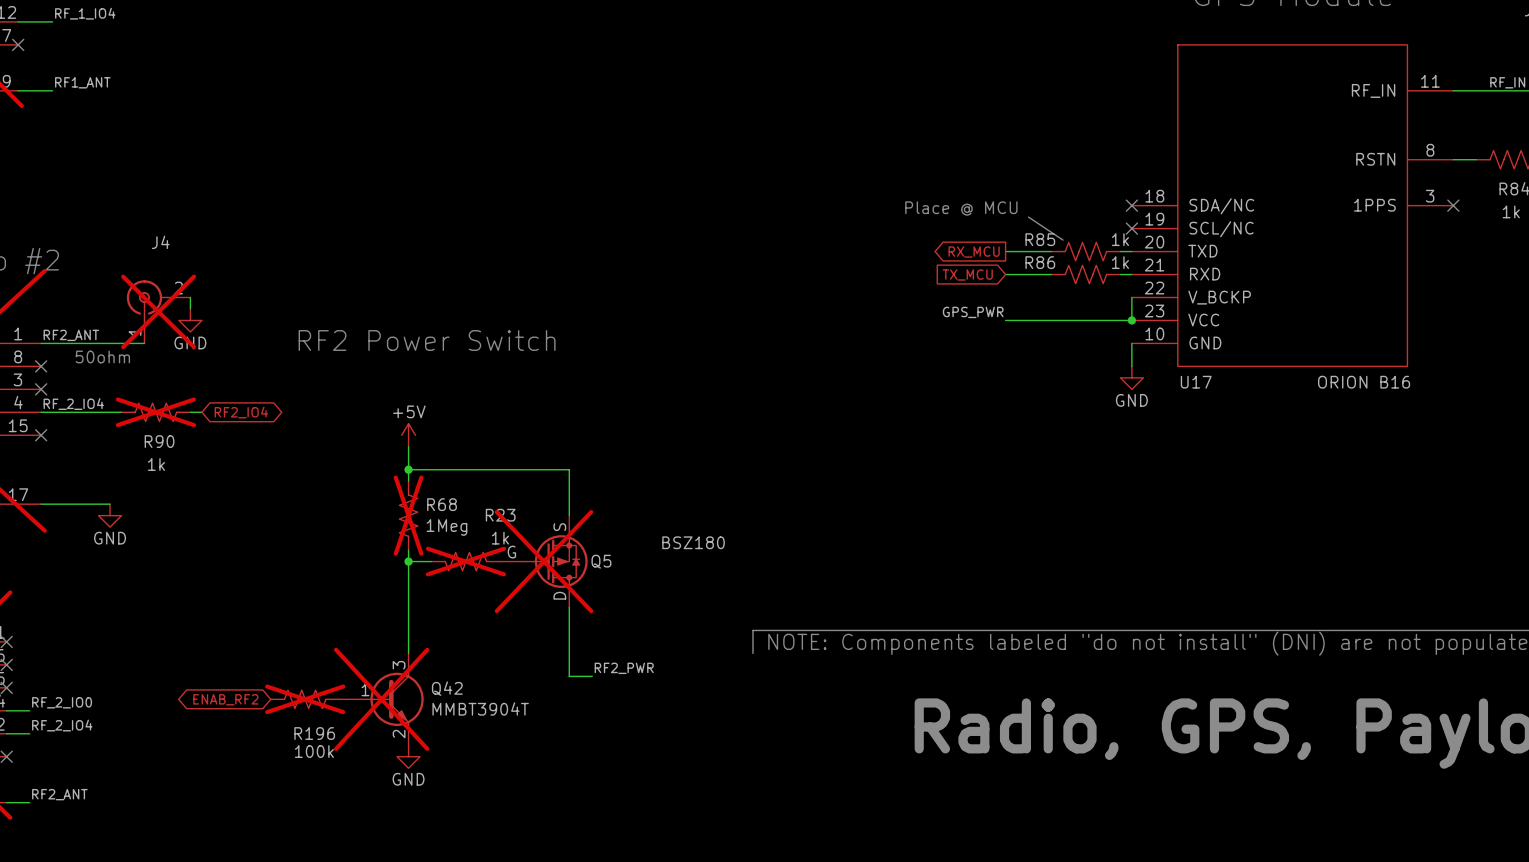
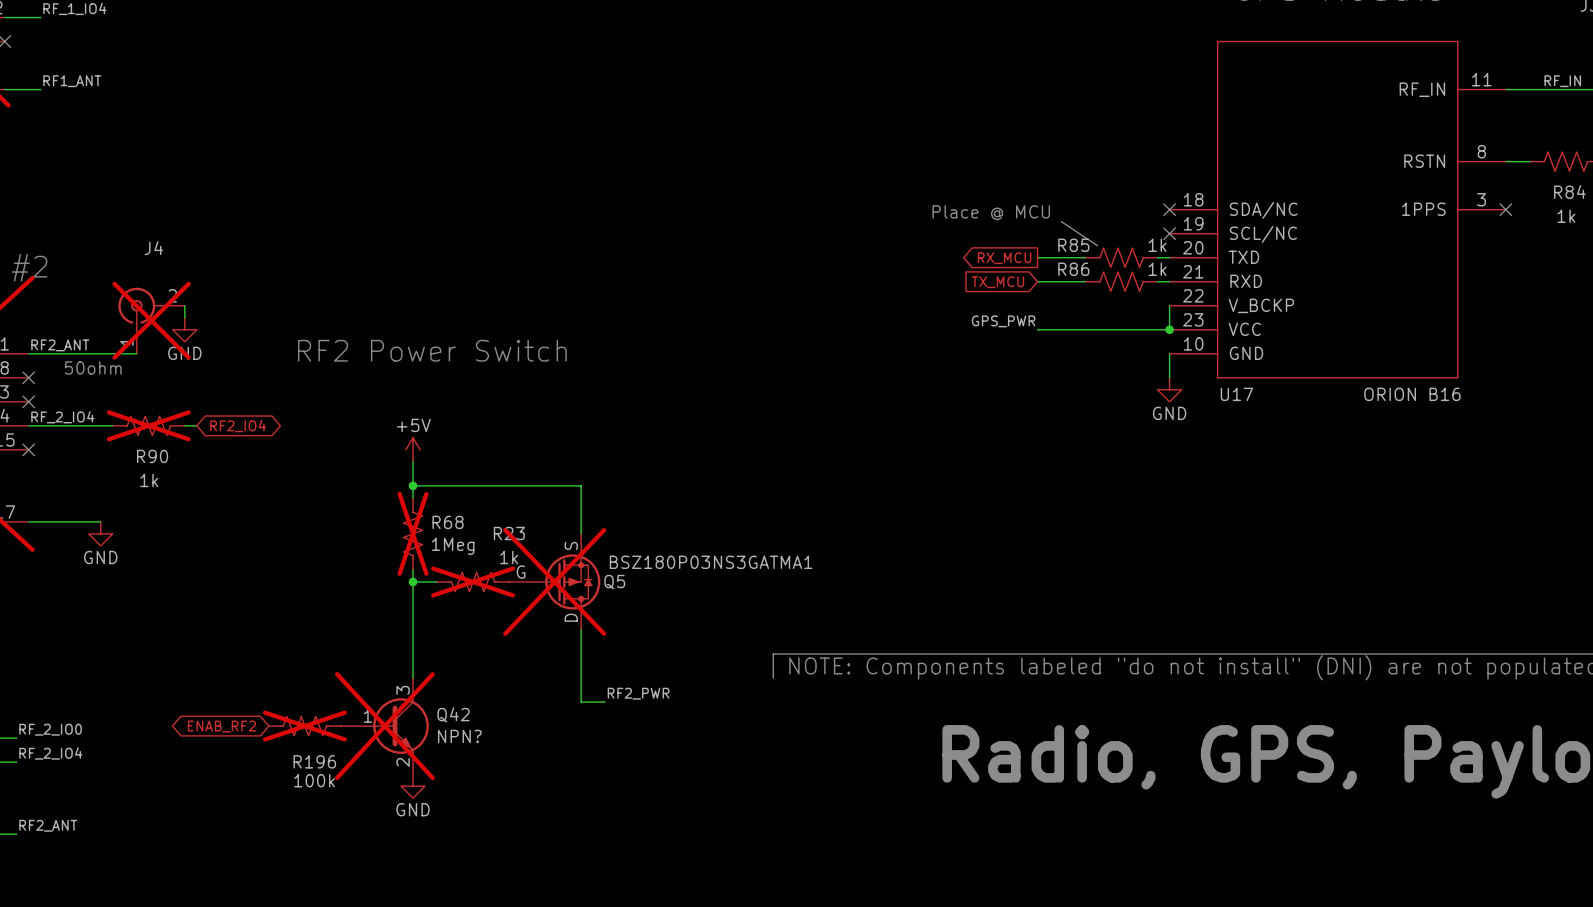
Q5 value: BSZ180 (693, 542) -> BSZ180P03NS3GATMA1 (711, 562)
Q42 value: MMBT3904T (480, 708) -> NPN? (459, 736)

